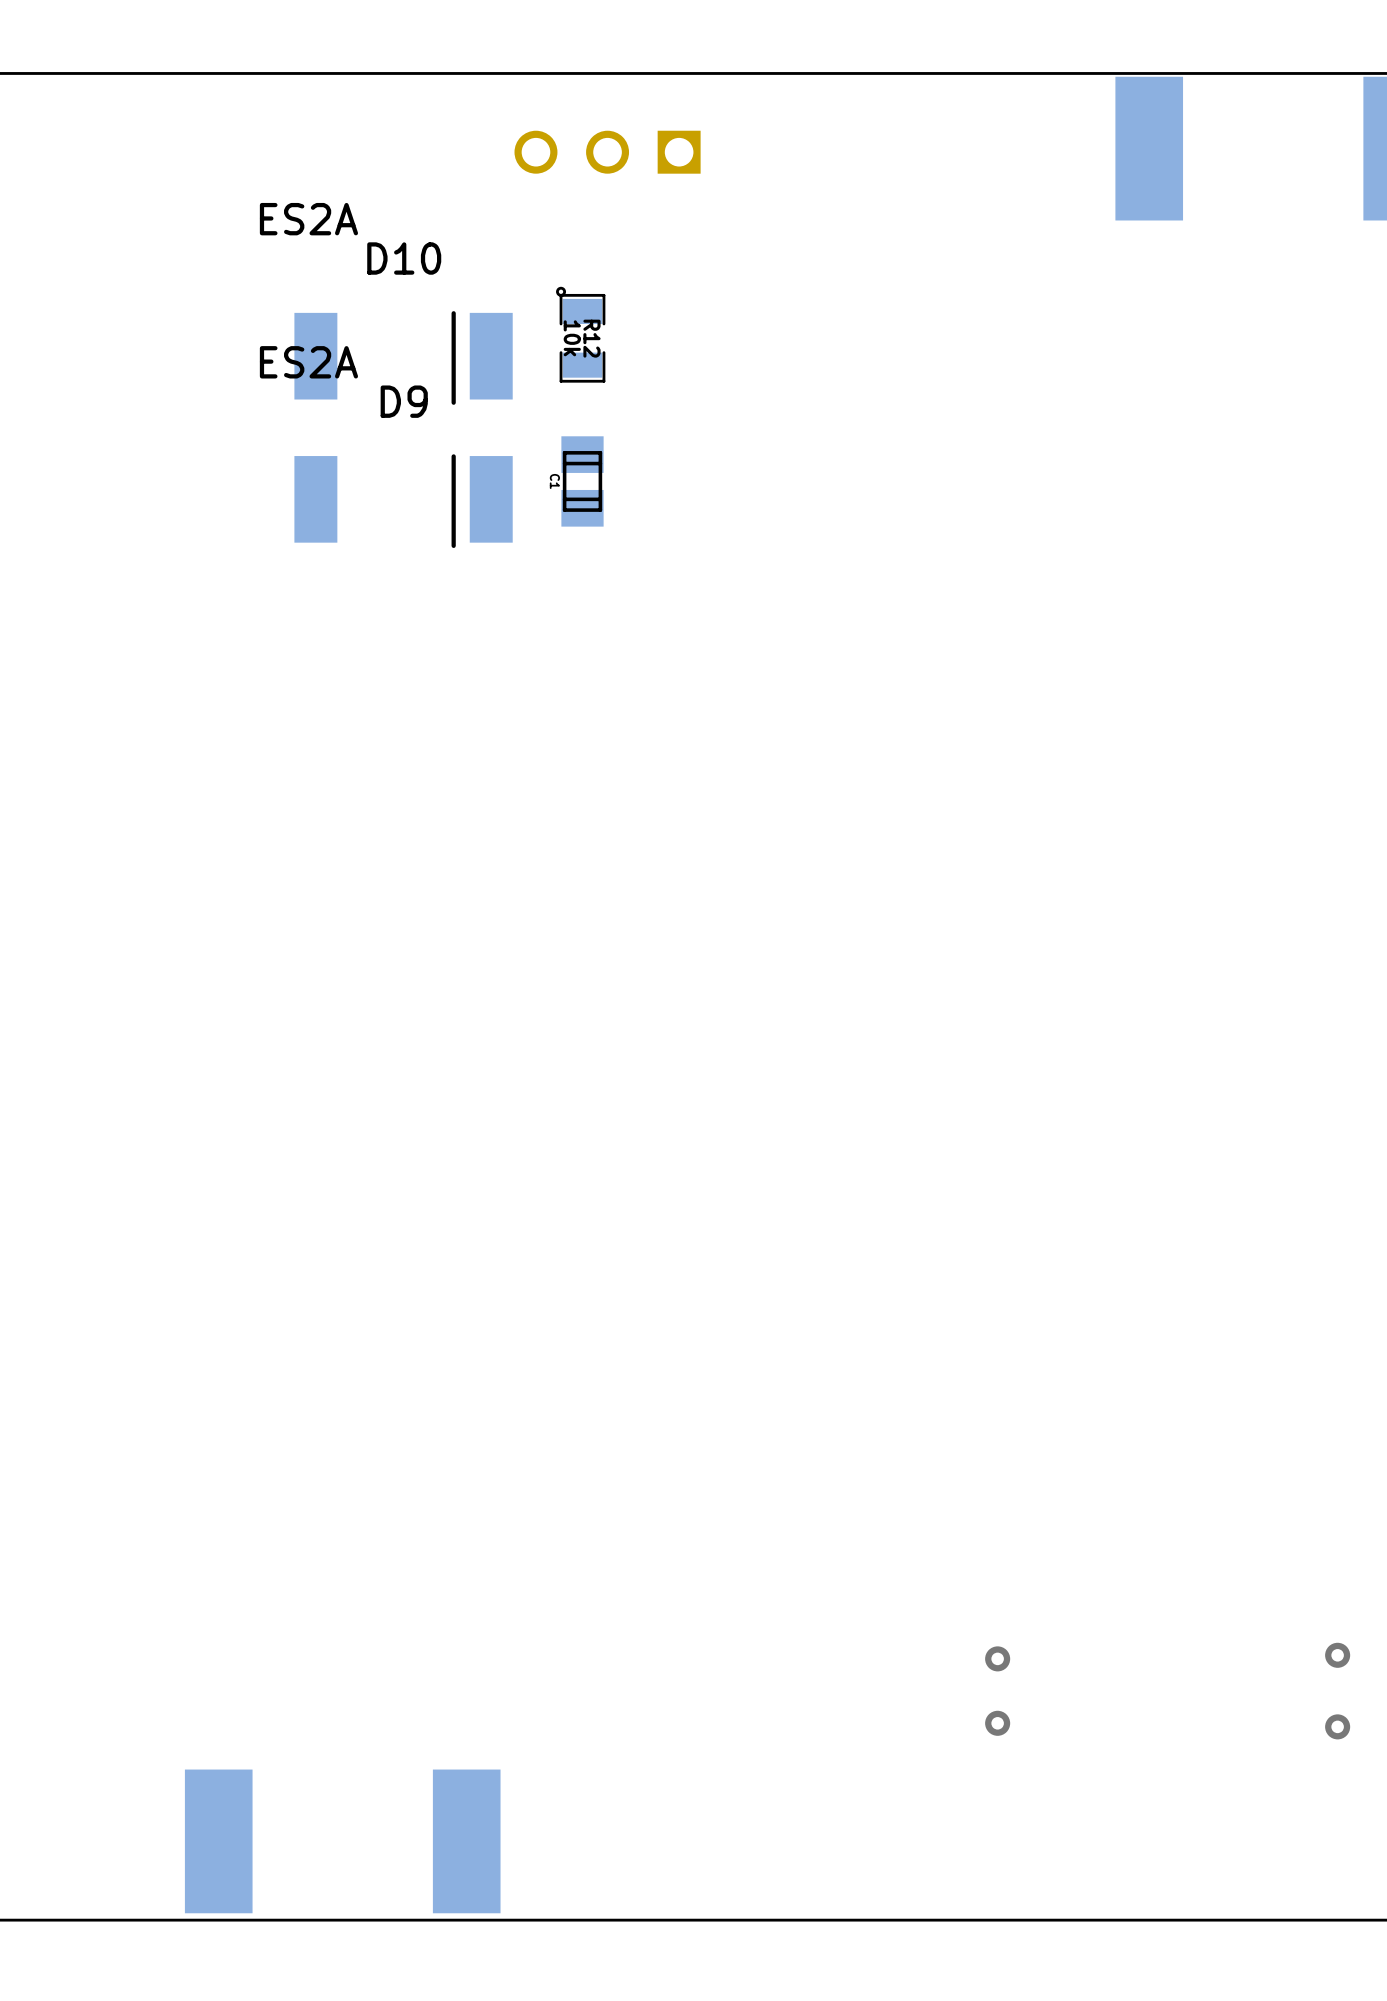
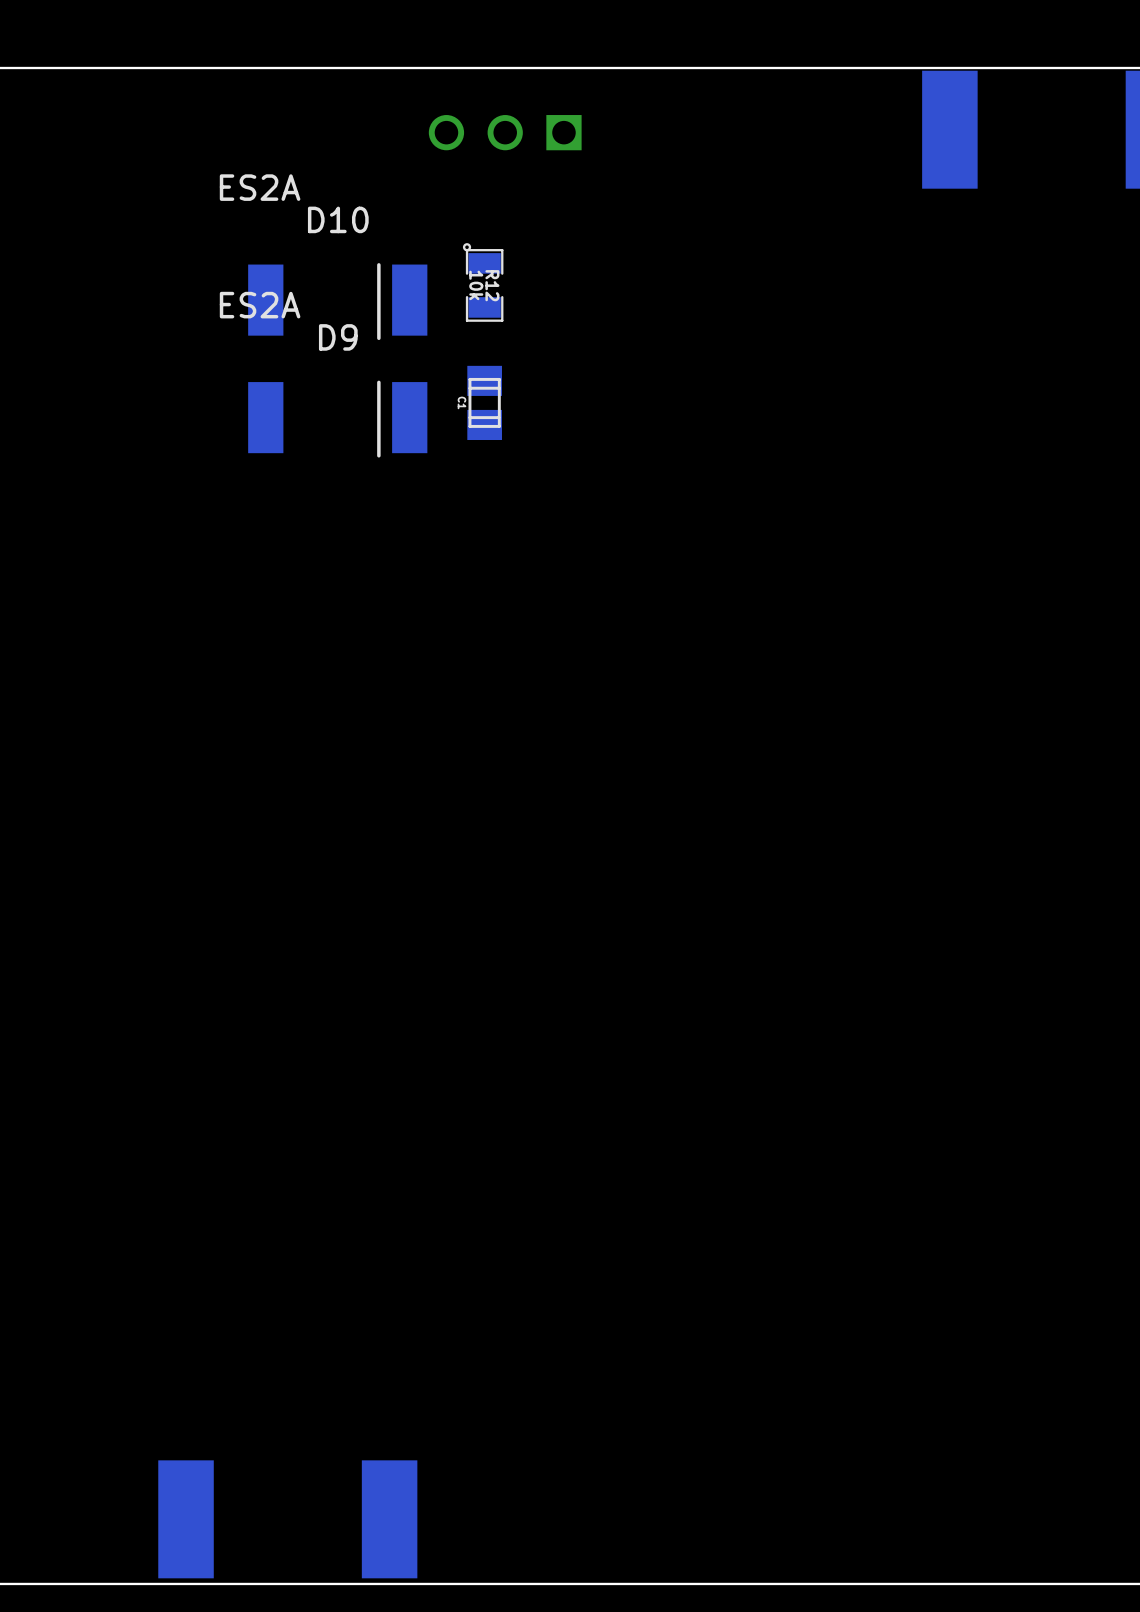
via: (1337, 1655) -> none
via: (997, 1658) -> none
via: (997, 1723) -> none
via: (1337, 1726) -> none

